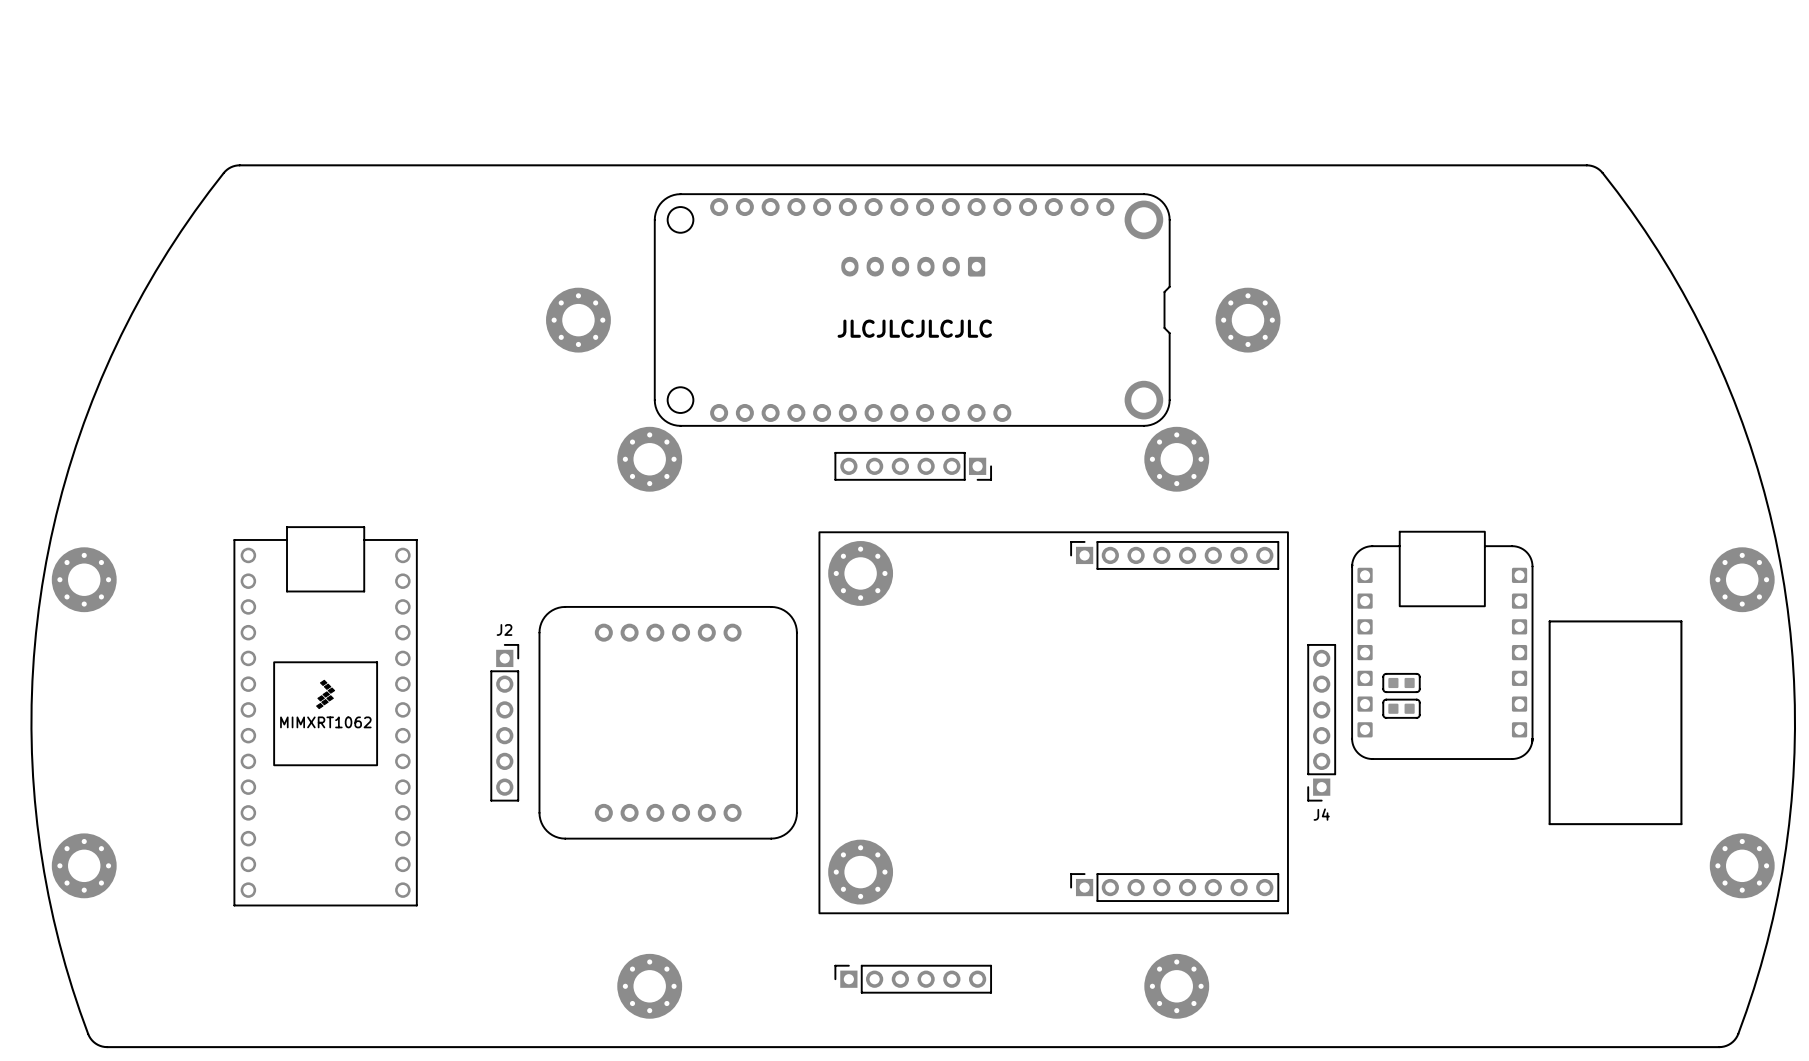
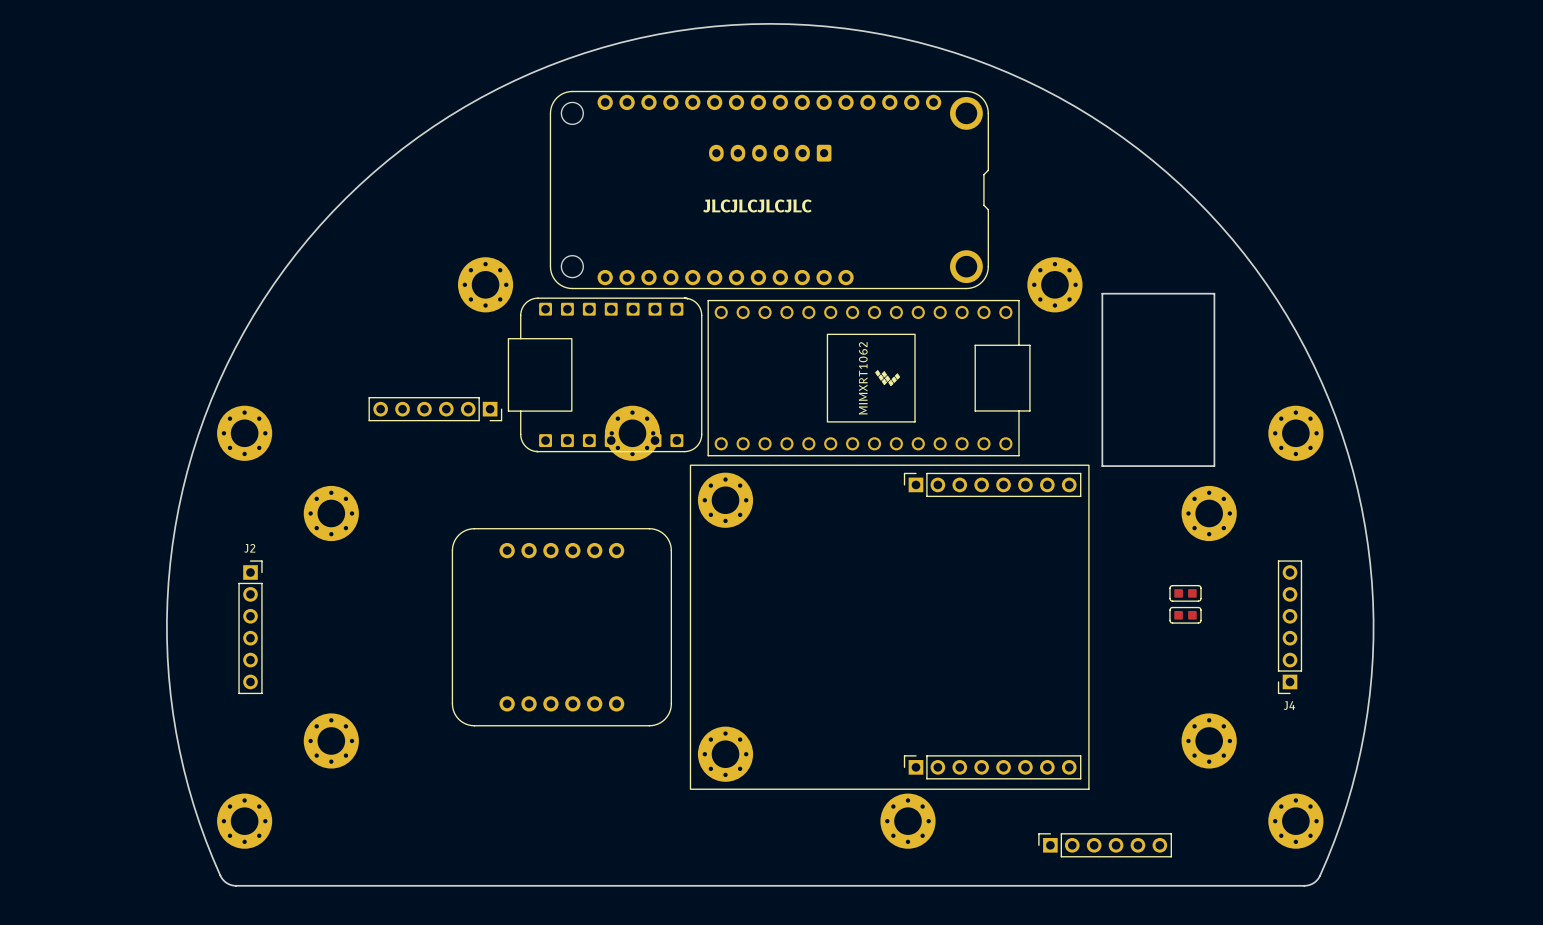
board edge: (239, 165) (1586, 165) (1597, 168) (1617, 191) (1658, 251) (1682, 292) (1715, 356) (1734, 400) (1757, 468) (1775, 538) (1784, 585) (1792, 657) (1794, 704) (1793, 776) (1789, 824) (1782, 872) (1767, 942) (1737, 1036) (1728, 1044) (1719, 1047) (107, 1047) (97, 1044) (88, 1034) (65, 965) (48, 895) (37, 824) (33, 776) (31, 704) (33, 657) (42, 585) (50, 538) (68, 468) (92, 400) (111, 356) (143, 292) (181, 230) (223, 172) (230, 167) (239, 165) -> (220, 875) (199, 823) (183, 769) (173, 713) (167, 657) (167, 601) (172, 544) (182, 489) (204, 417) (226, 365) (253, 315) (296, 254) (333, 211) (373, 172) (417, 137) (465, 106) (515, 80) (567, 59) (639, 38) (695, 28) (751, 24) (807, 25) (863, 31) (919, 42) (973, 59) (1042, 88) (1091, 116) (1137, 148) (1180, 185) (1232, 239) (1266, 284) (1296, 332) (1321, 382) (1342, 435) (1361, 507) (1371, 582) (1373, 638) (1367, 713) (1356, 769) (1334, 840) (1320, 875) (1312, 884) (1304, 885) (236, 885) (226, 883) (220, 875)
part position: (913, 266) -> (770, 153)
part position: (912, 310) -> (769, 190)
text position: JLCJLCJLCJLC (914, 328) -> JLCJLCJLCJLC (757, 205)
board edge: none -> (1102, 293) (1102, 466) (1214, 466) (1214, 293) (1102, 293)
part: none -> (605, 374)
part: none -> (869, 378)
part position: (649, 459) -> (632, 433)
part: (1176, 459) -> none
part: none -> (435, 409)
part: (913, 466) -> none
part: none -> (244, 433)
part: none -> (1295, 433)
part: (84, 579) -> none
part: (1742, 579) -> none
part: none -> (331, 513)
part: none -> (1209, 513)
board edge: (1549, 621) (1549, 824) (1681, 824) (1681, 621) (1549, 621) -> none
part: (1442, 645) -> none
part: (325, 716) -> none
J2 position: (504, 722) -> (250, 627)
J4 position: (1321, 722) -> (1290, 627)
part: none -> (331, 740)
part: none -> (1209, 740)
part: (84, 865) -> none
part: (1742, 865) -> none
part: none -> (244, 821)
part: none -> (1295, 821)
part: (913, 979) -> none
part: none -> (1105, 845)
part: (649, 986) -> none
part position: (1176, 986) -> (908, 821)

